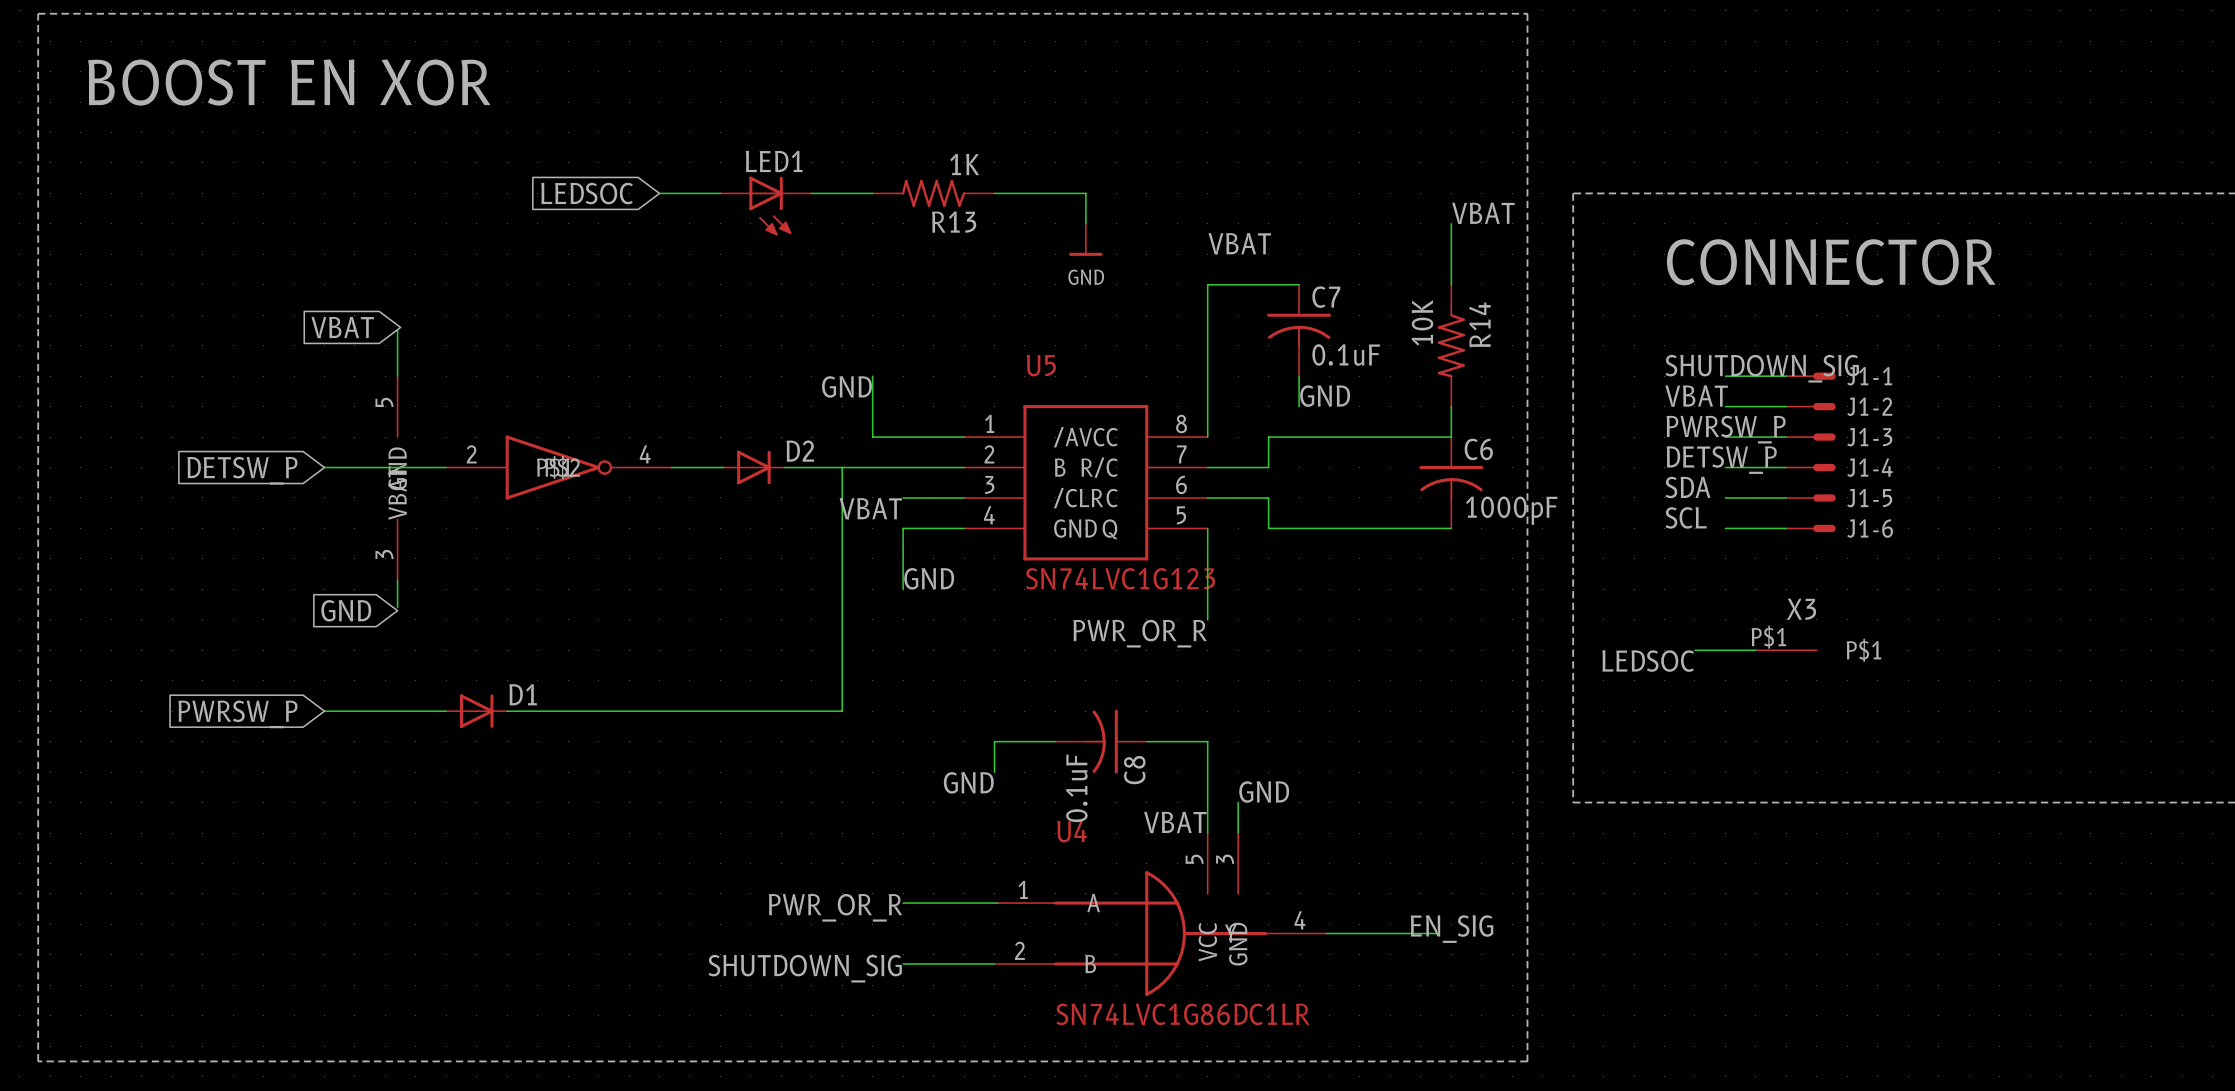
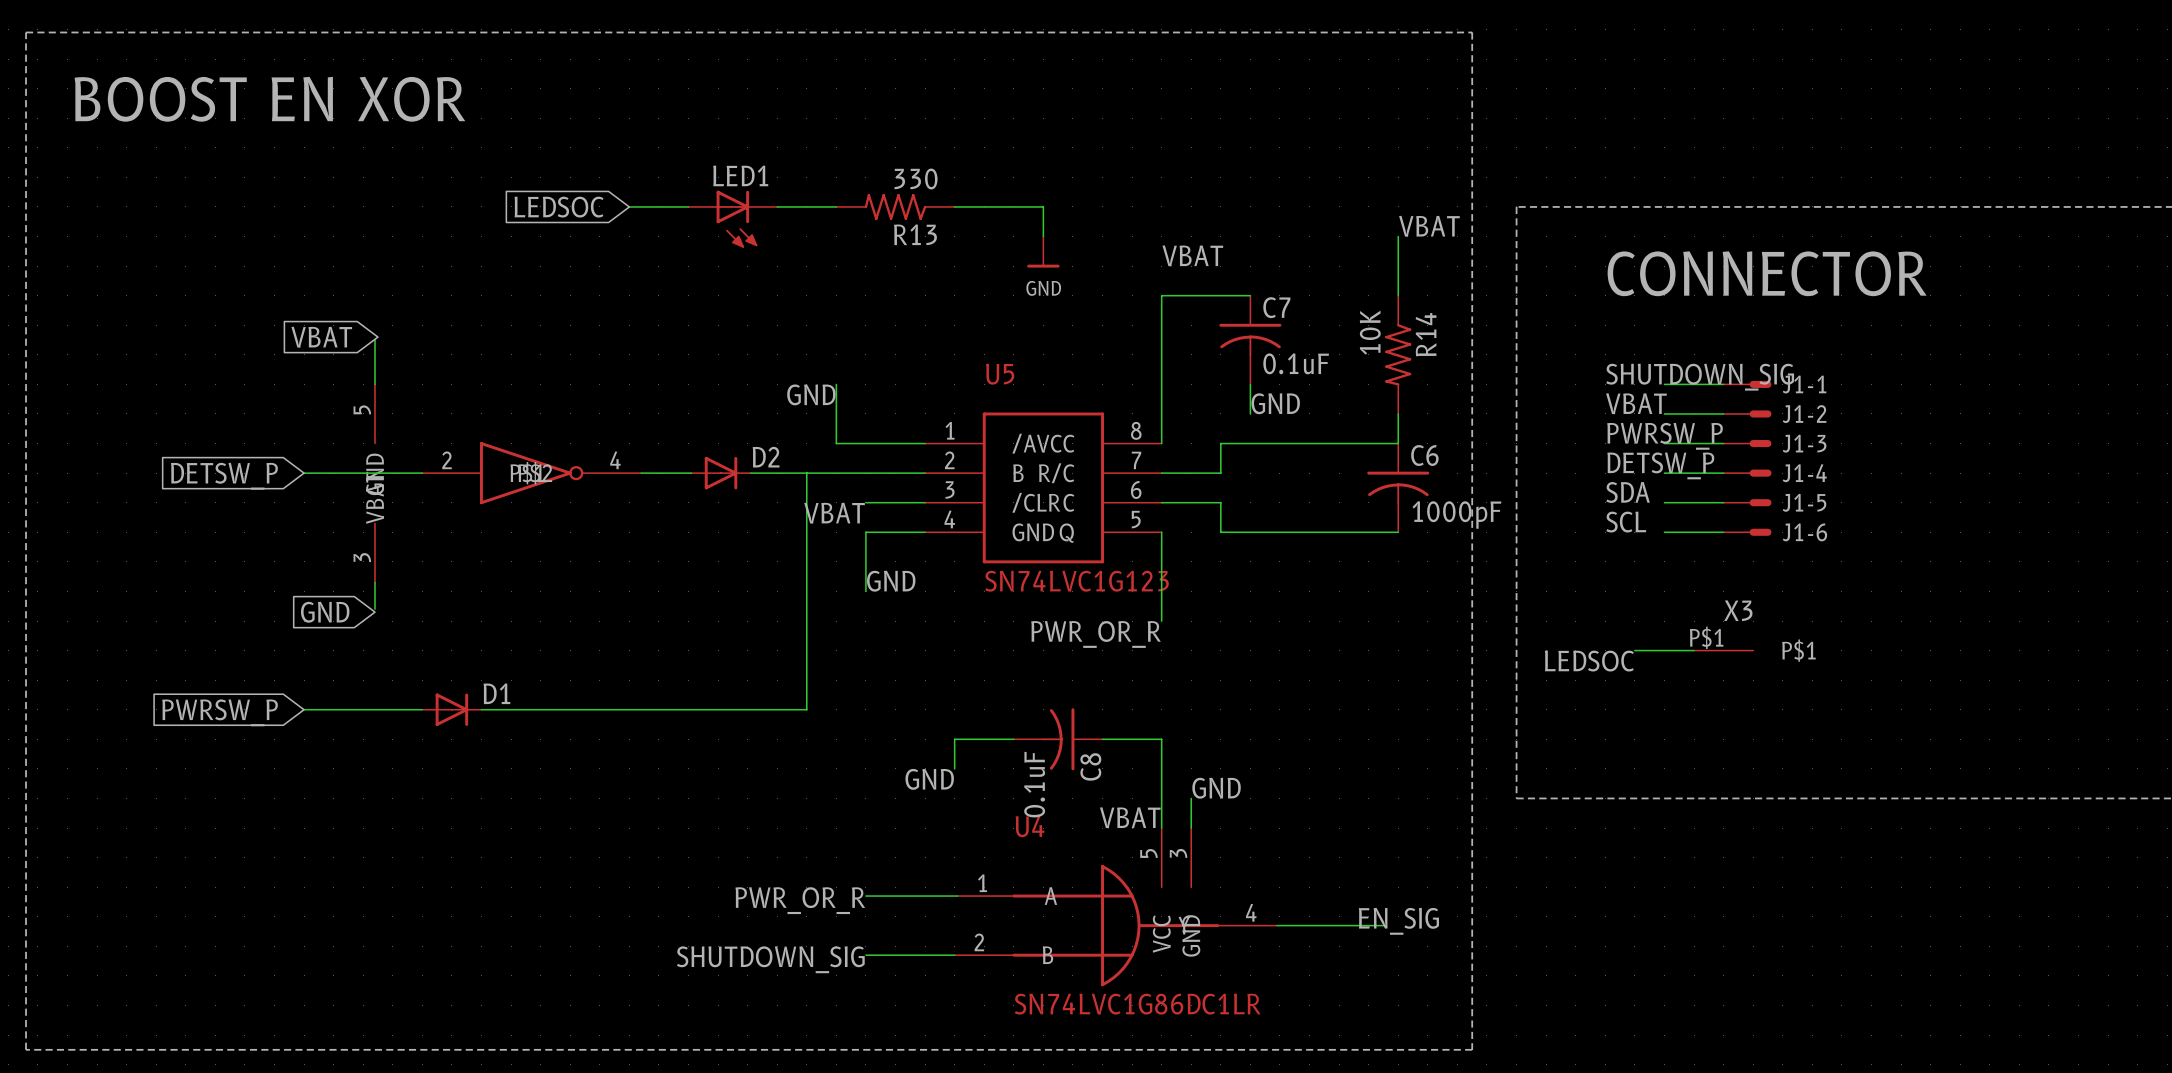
R13 value: 1K (964, 164) -> 330 (916, 179)

